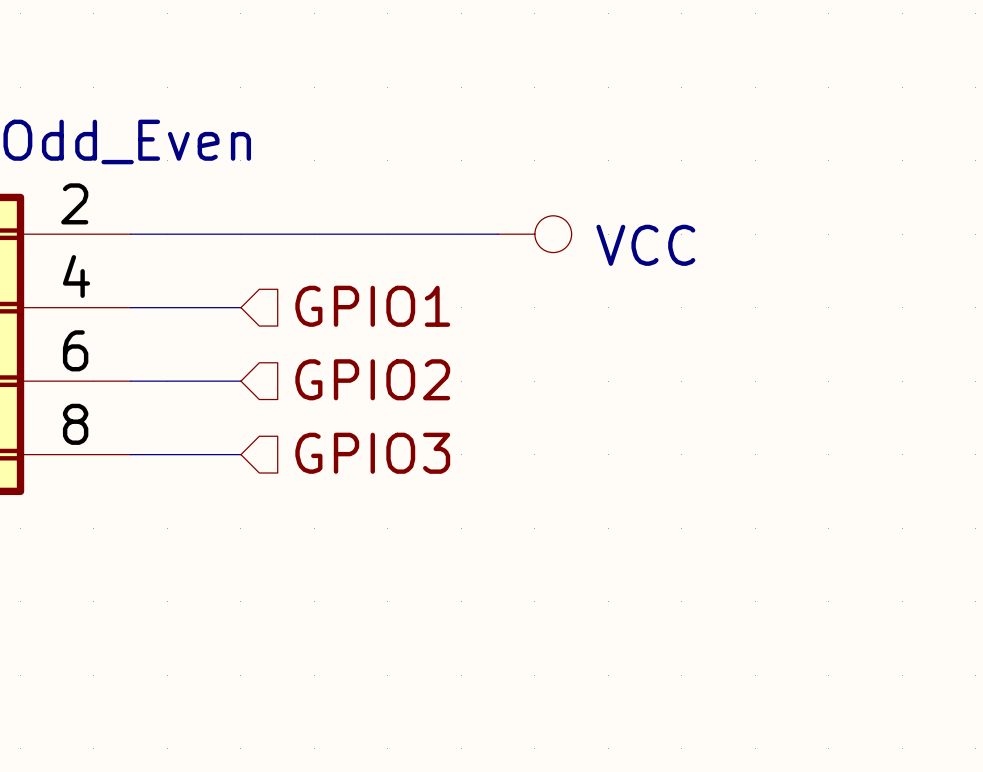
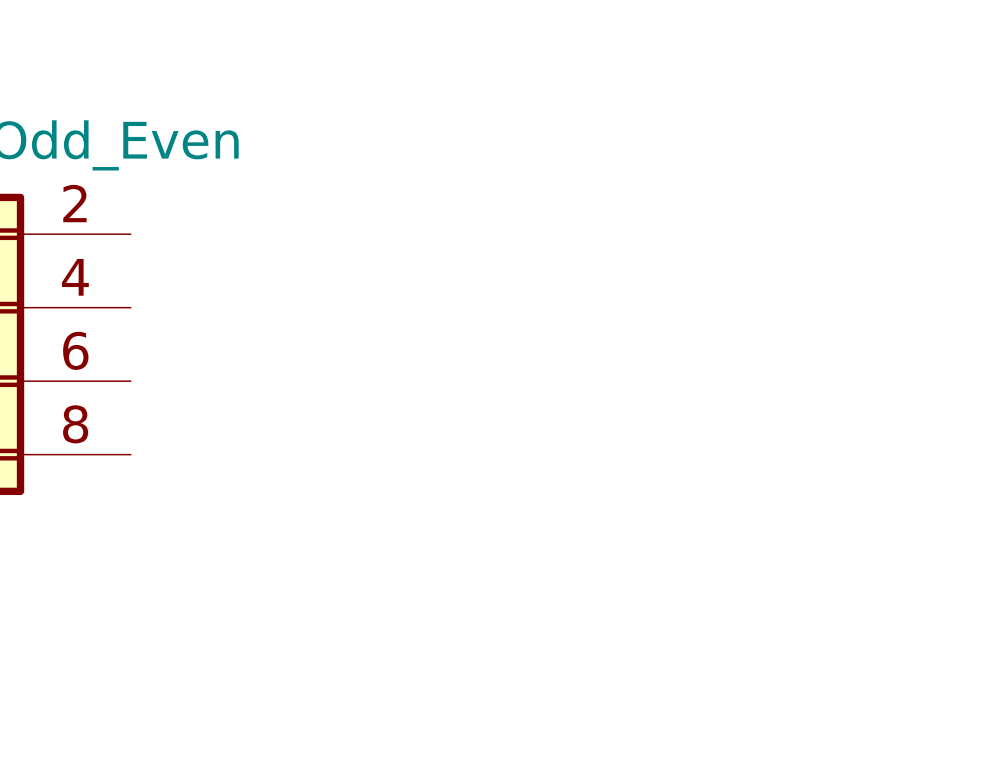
wire: (130, 234) (498, 234) -> none
power symbol: VCC (534, 234) -> none
hierarchical label: GPIO1 (372, 306) -> none
wire: (130, 307) (240, 307) -> none
hierarchical label: GPIO2 (372, 379) -> none
wire: (130, 381) (240, 381) -> none
hierarchical label: GPIO3 (372, 453) -> none
wire: (130, 454) (240, 454) -> none

